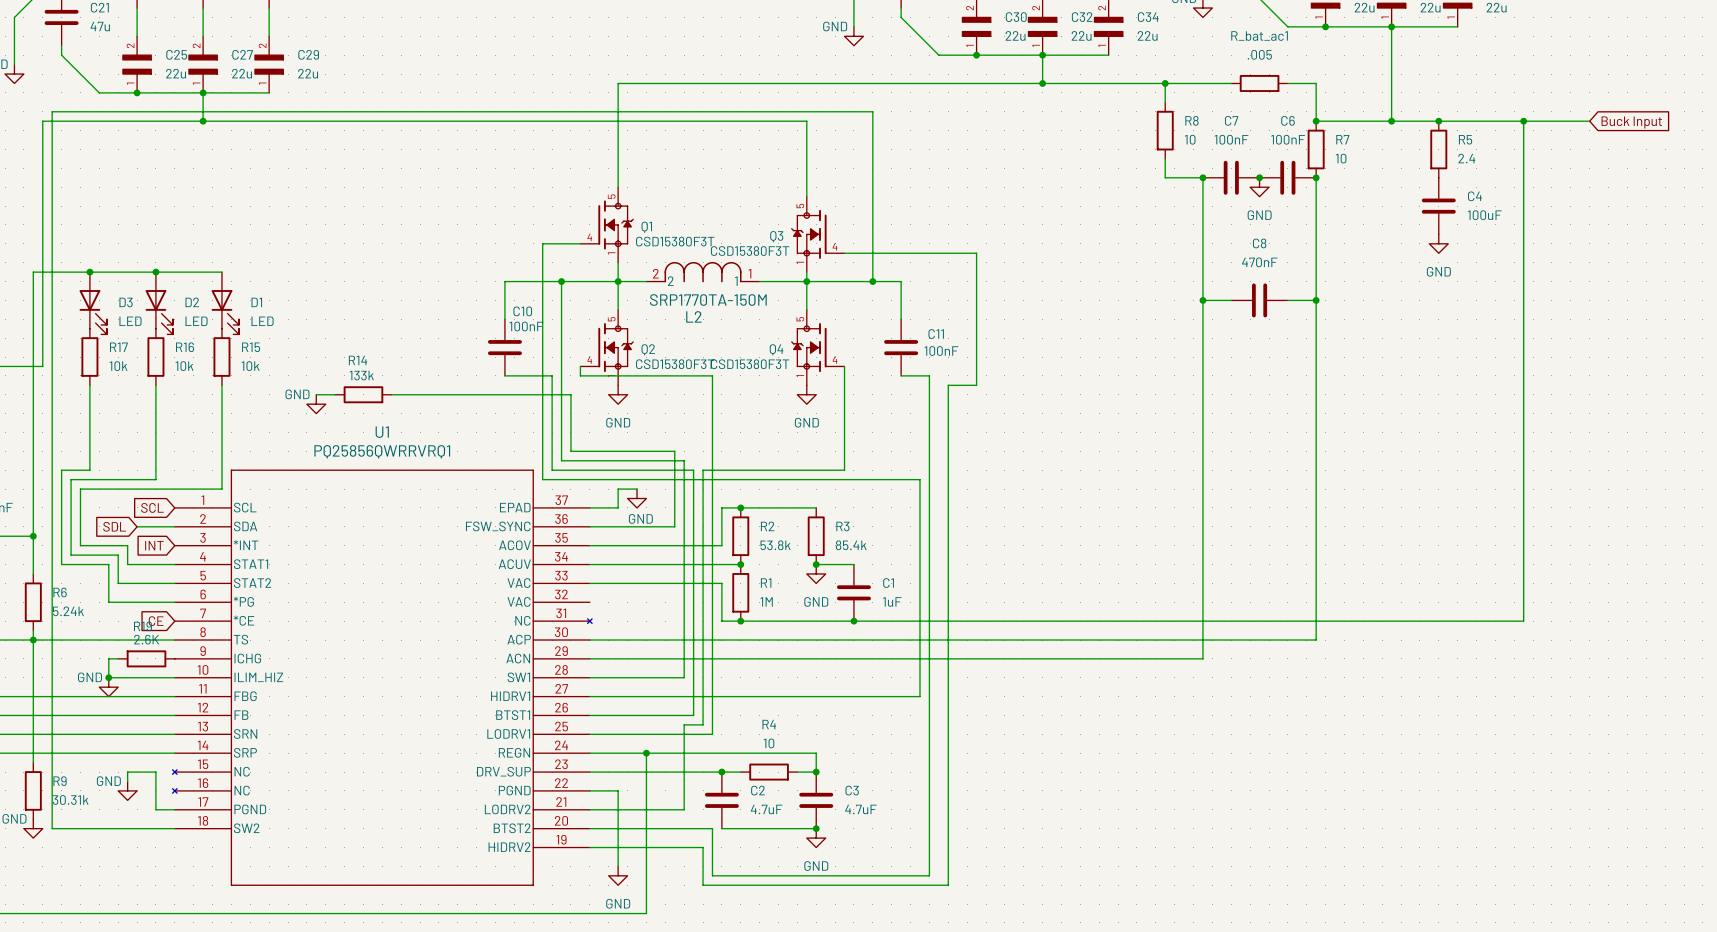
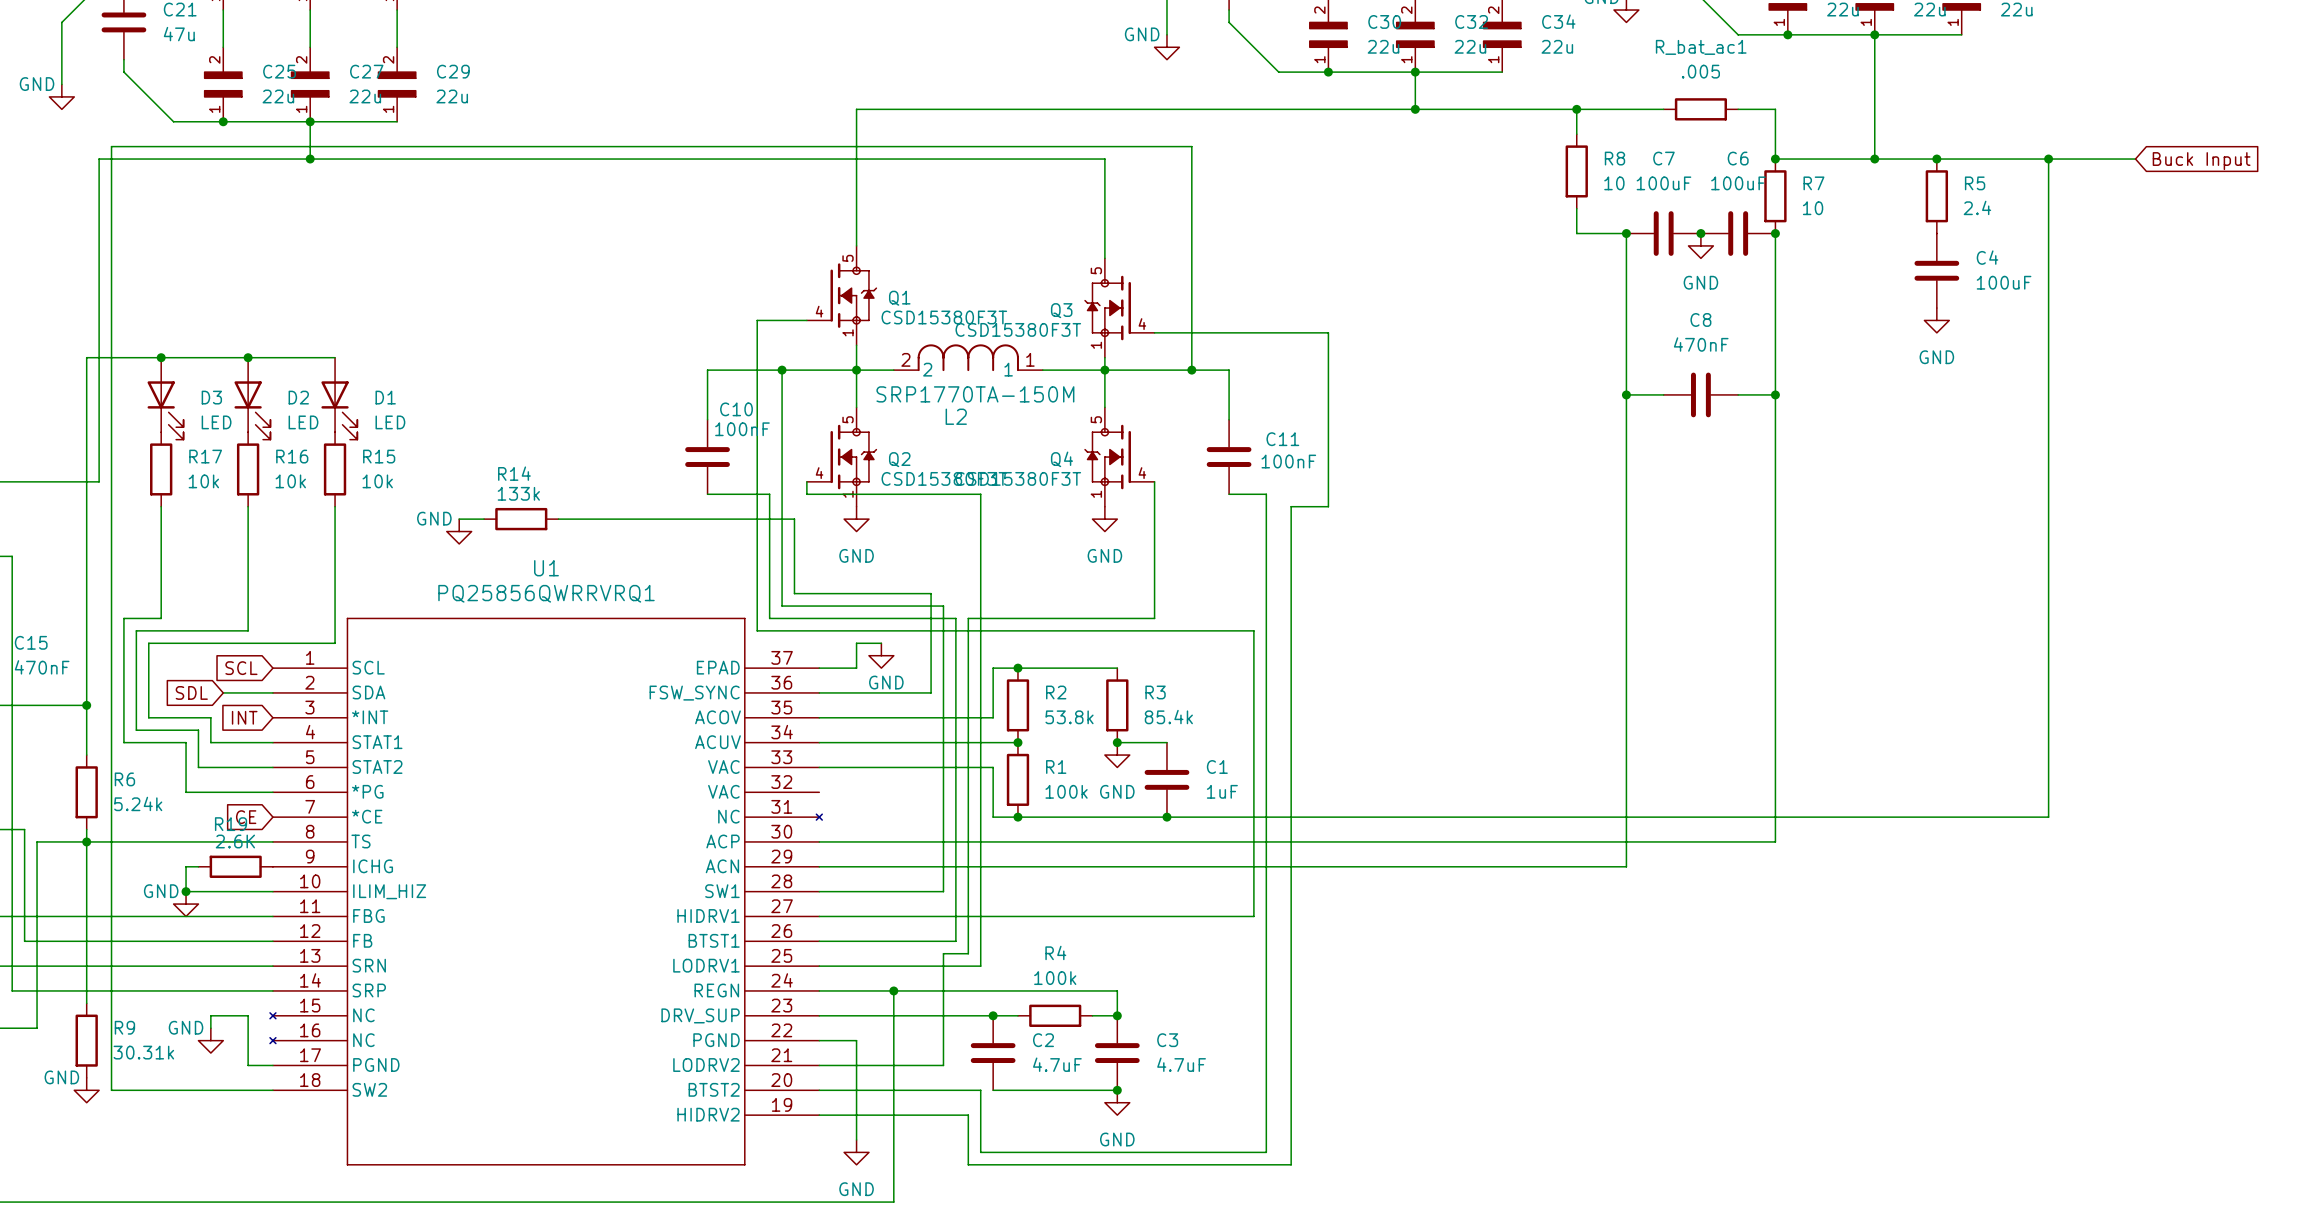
C7 value: 100nF (1231, 139) -> 100uF (1663, 183)
C6 value: 100nF (1288, 139) -> 100uF (1738, 183)
R1 value: 1M (766, 601) -> 100k (1066, 791)
R4 value: 10 (768, 743) -> 100k (1055, 978)

